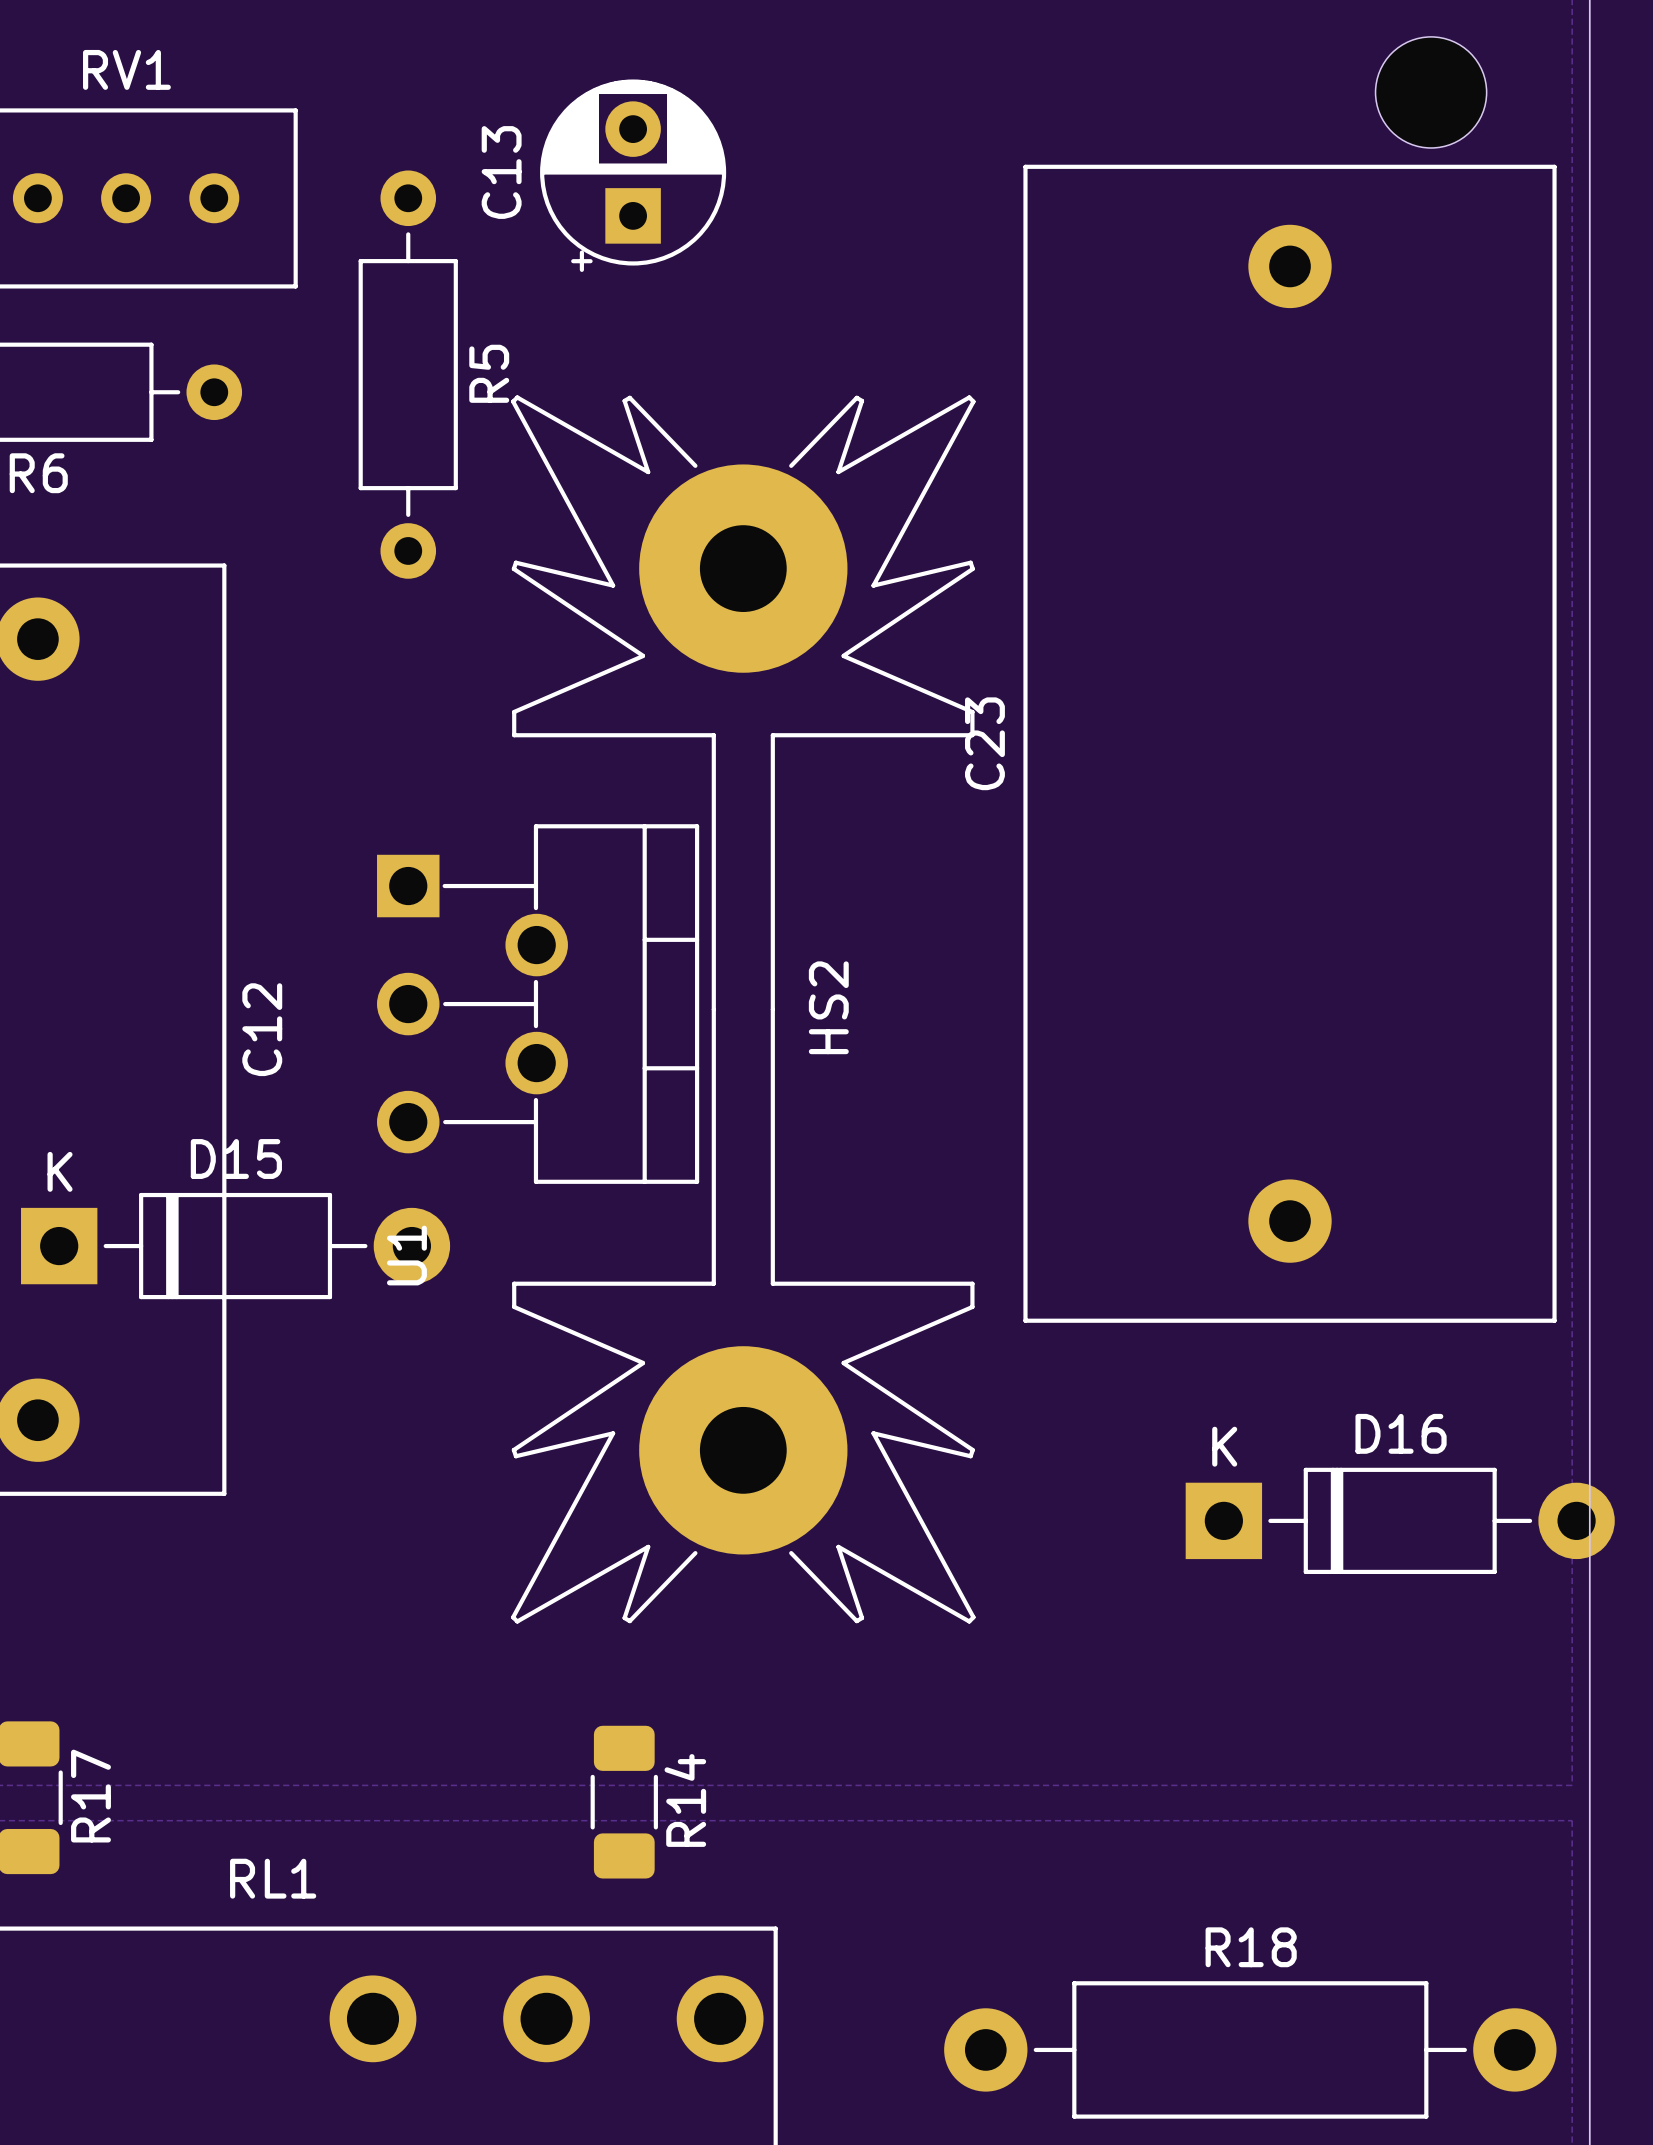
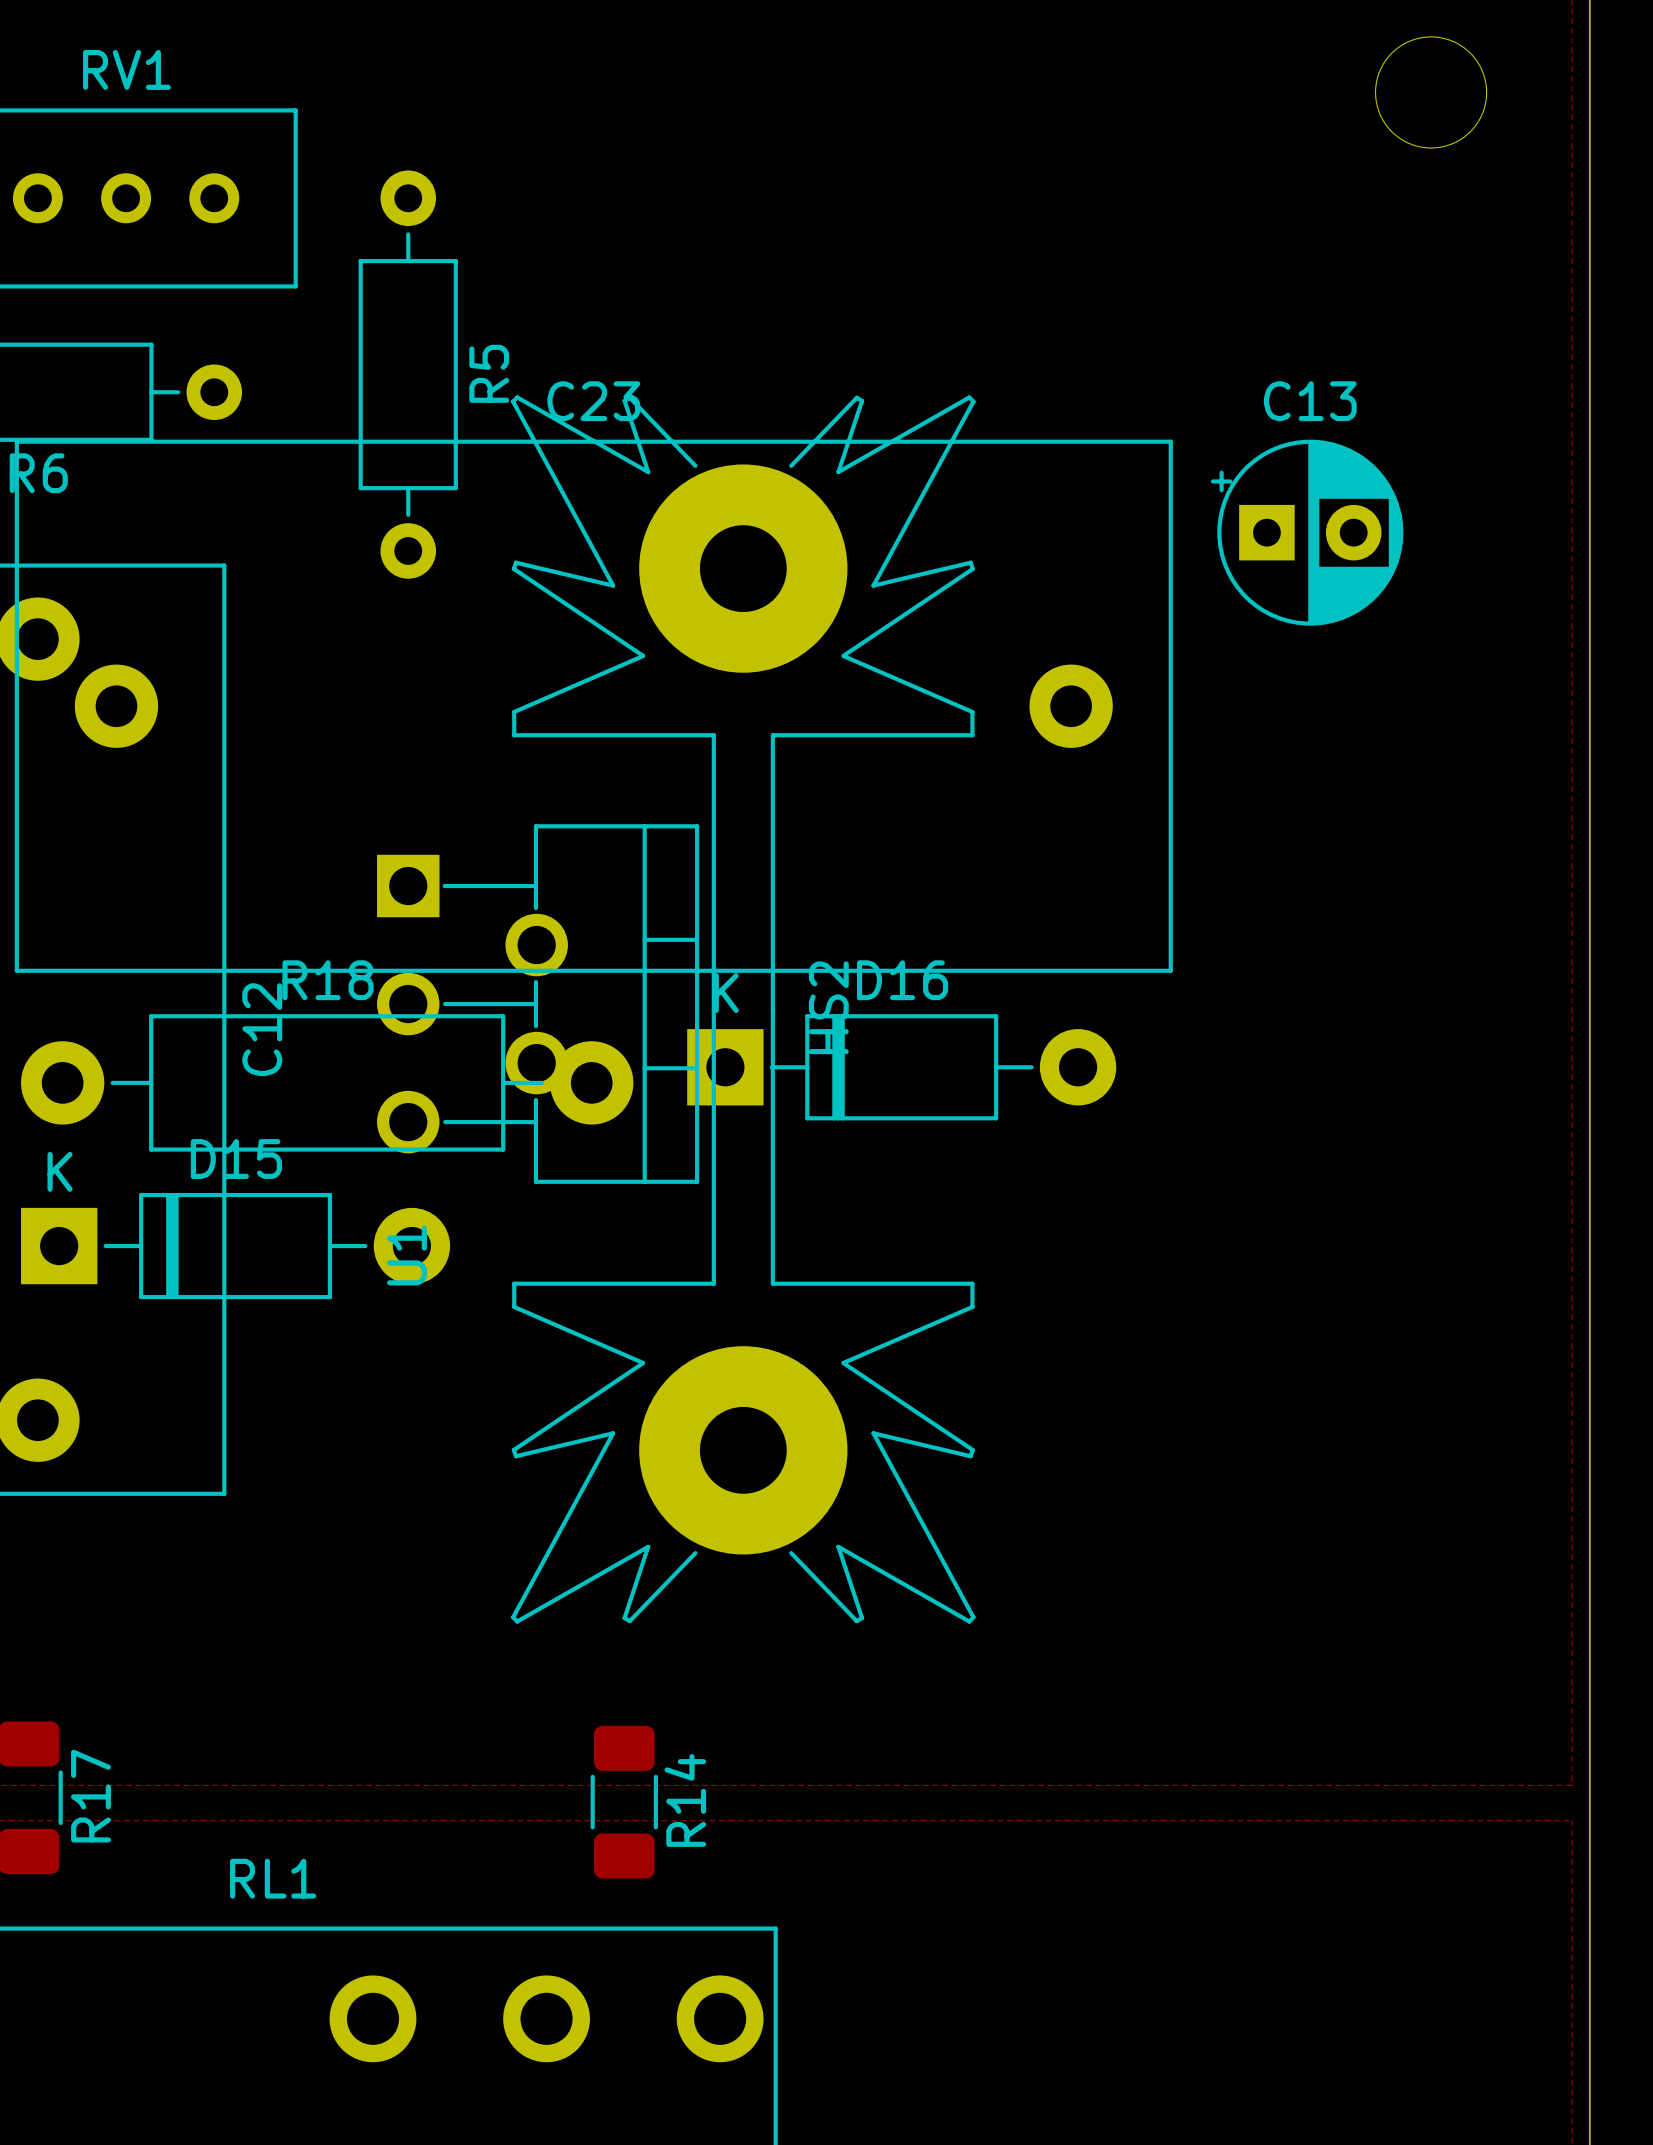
C13 rotation: 0° (633, 175) -> 90° clockwise (1307, 532)
C13 position: (633, 175) -> (1307, 532)
C23 rotation: 0° (1290, 743) -> 90° clockwise (593, 706)
C23 position: (1290, 743) -> (593, 706)
D16 position: (1400, 1520) -> (901, 1067)
R18 position: (1250, 2049) -> (327, 1082)

